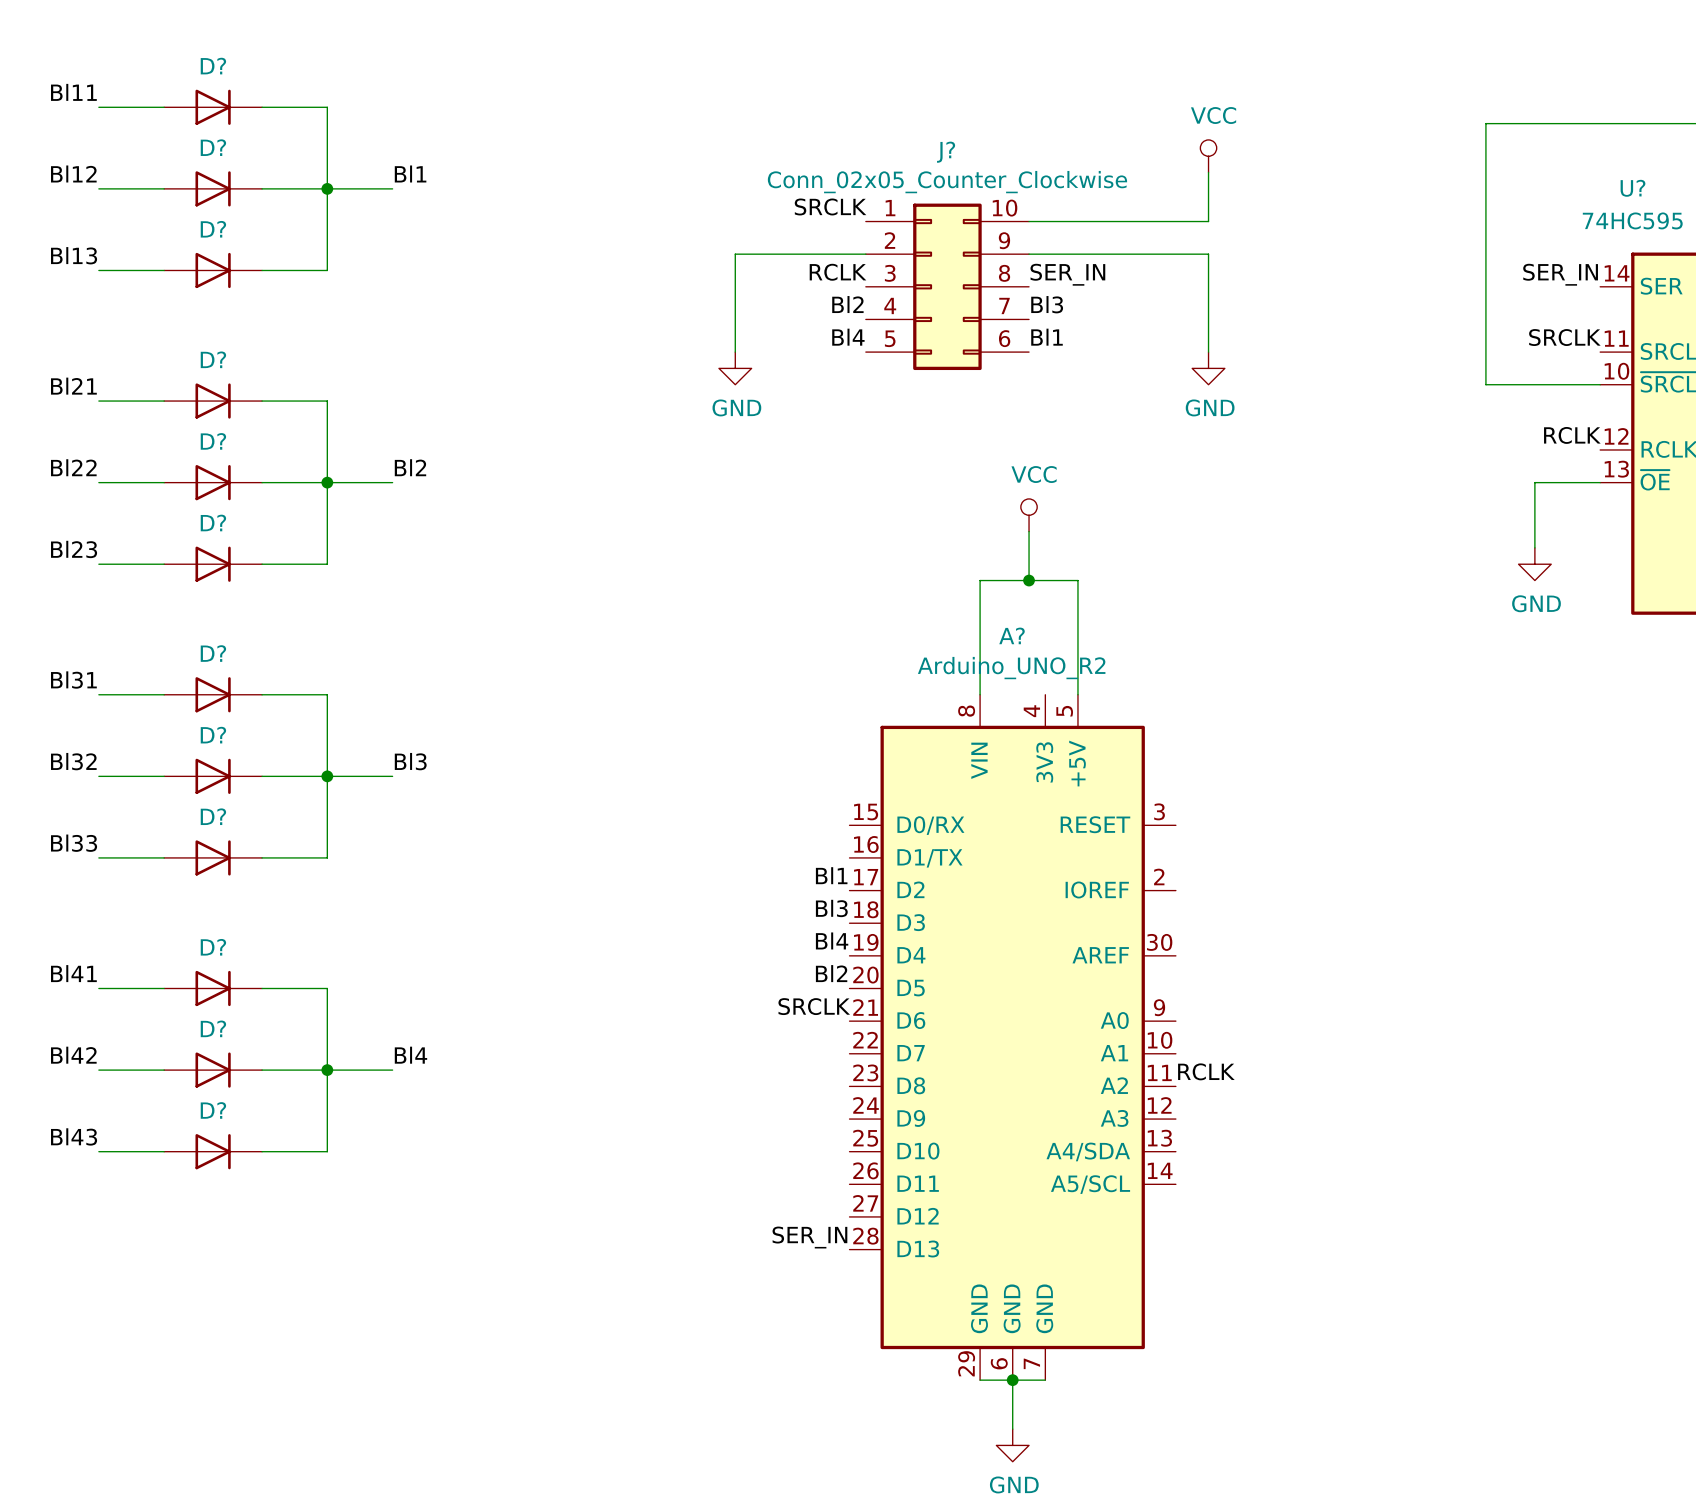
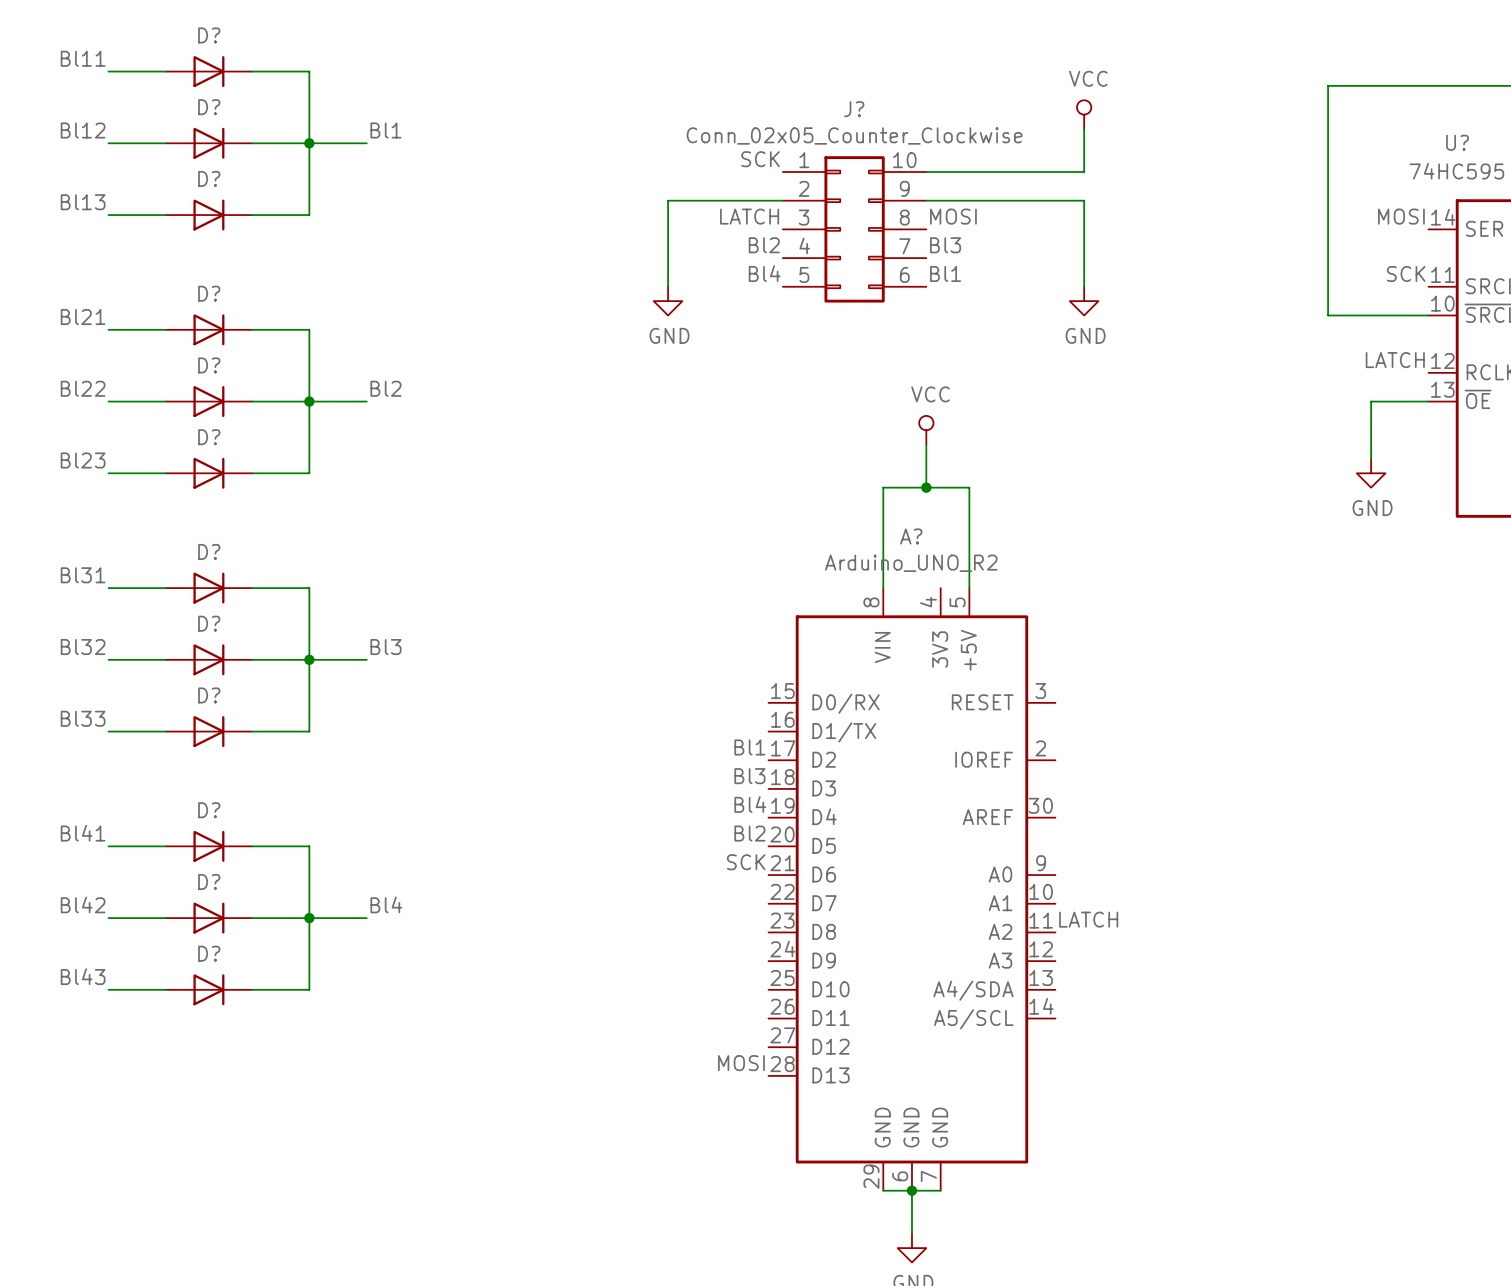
label: SRCLK (830, 206) -> SCK (760, 159)
label: RCLK (838, 272) -> LATCH (749, 216)
label: SER_IN (1067, 274) -> MOSI (953, 216)
label: SER_IN (1560, 274) -> MOSI (1401, 216)
label: SRCLK (1564, 337) -> SCK (1406, 273)
label: RCLK (1572, 435) -> LATCH (1395, 360)
label: SRCLK (814, 1006) -> SCK (746, 862)
label: RCLK (1206, 1071) -> LATCH (1088, 919)
label: SER_IN (809, 1237) -> MOSI (741, 1063)

